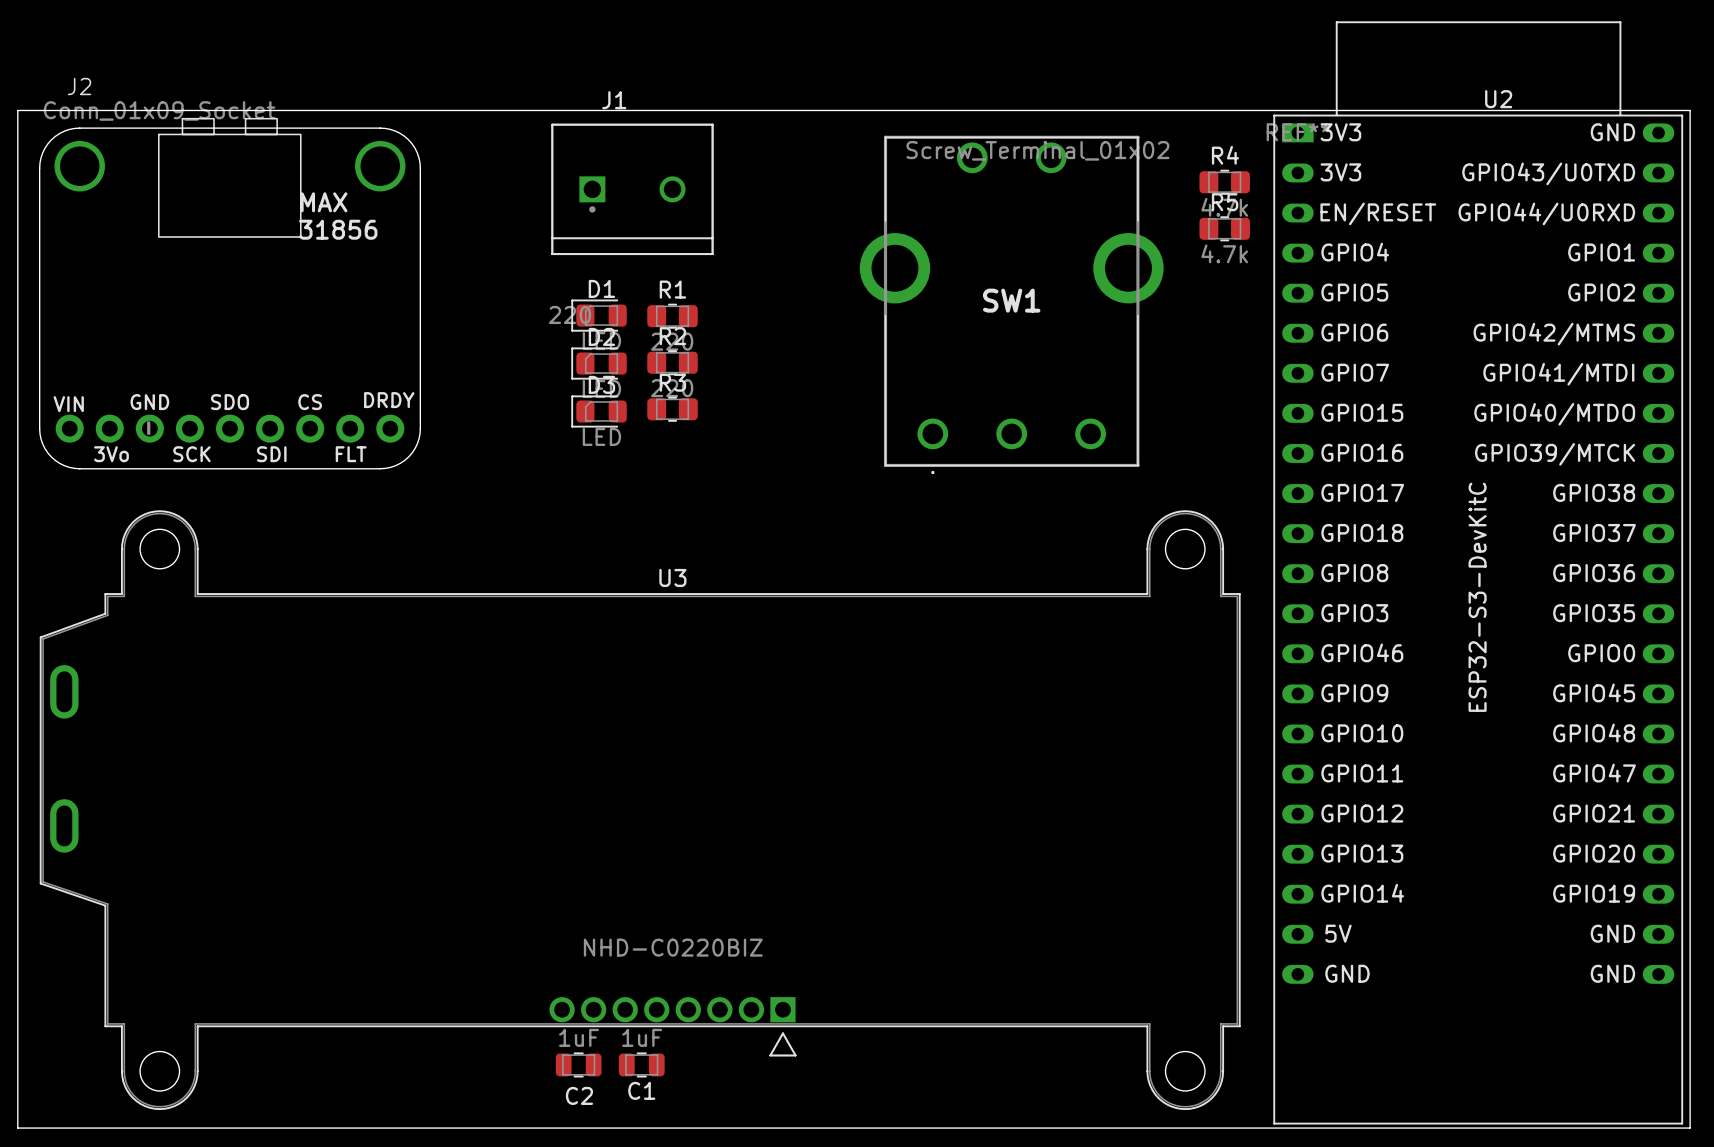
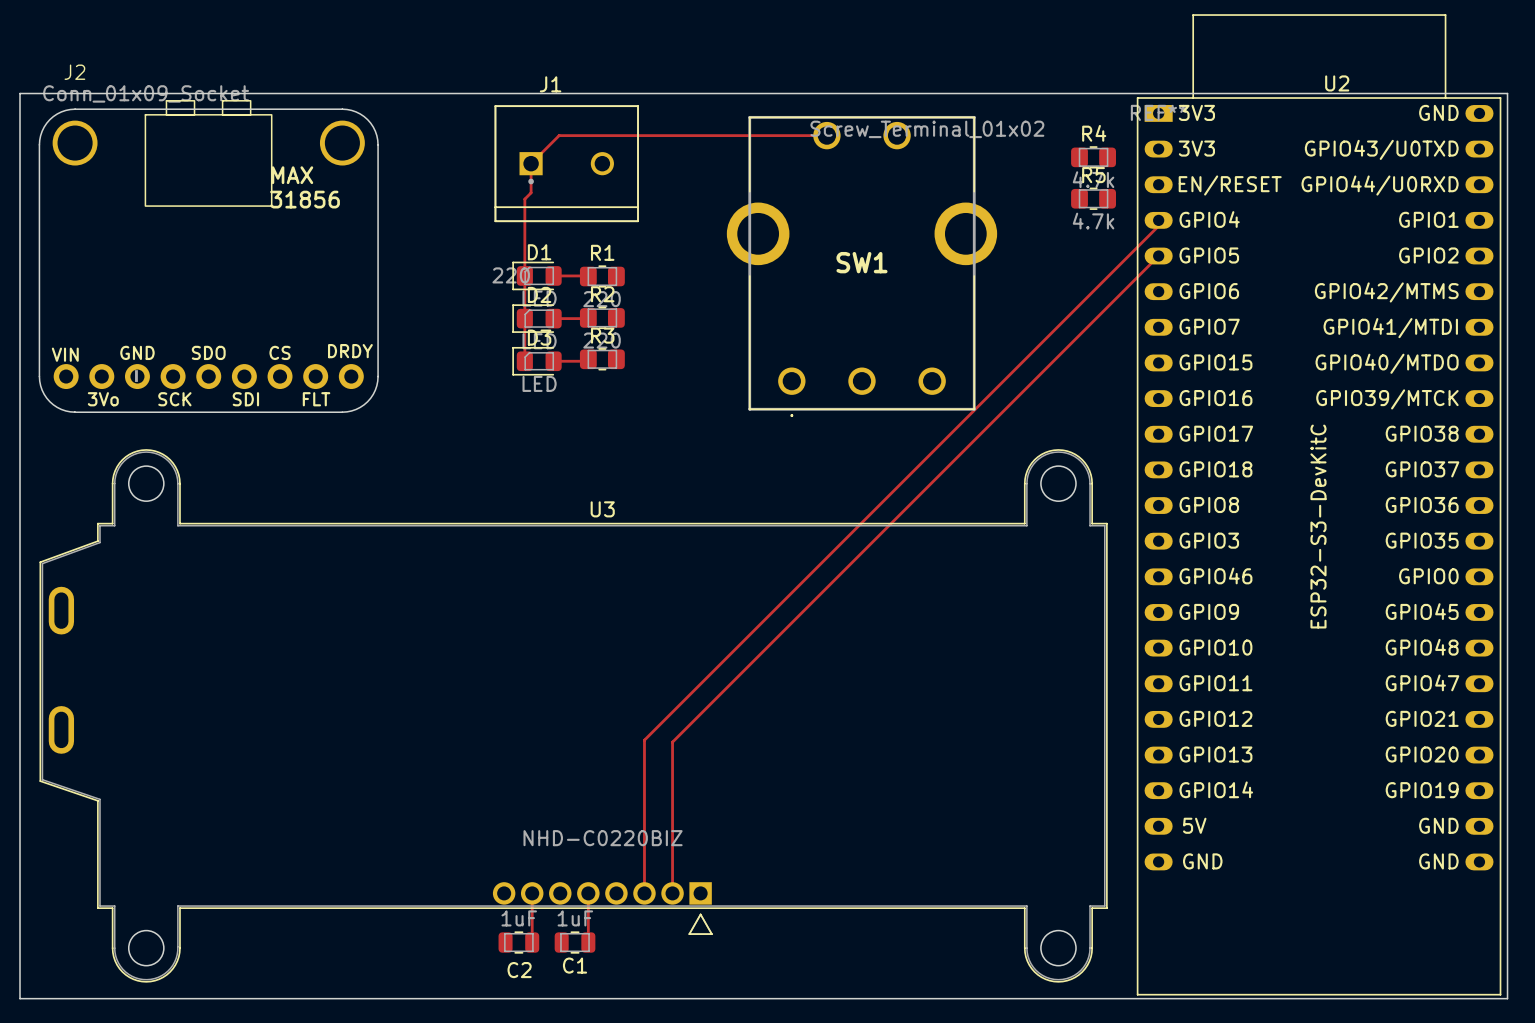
track: none -> (826, 135) (559, 135) (531, 163) (531, 192) (524, 199) (524, 361)
track: none -> (1158, 220) (1158, 225) (644, 740) (644, 893)
track: none -> (1158, 256) (672, 742) (672, 893)
SW1 position: (1011, 304) -> (861, 266)
track: none -> (588, 275) (553, 275)
track: none -> (588, 317) (553, 318)
track: none -> (588, 360) (553, 361)
track: none -> (532, 893) (532, 942)
track: none -> (588, 893) (588, 942)

